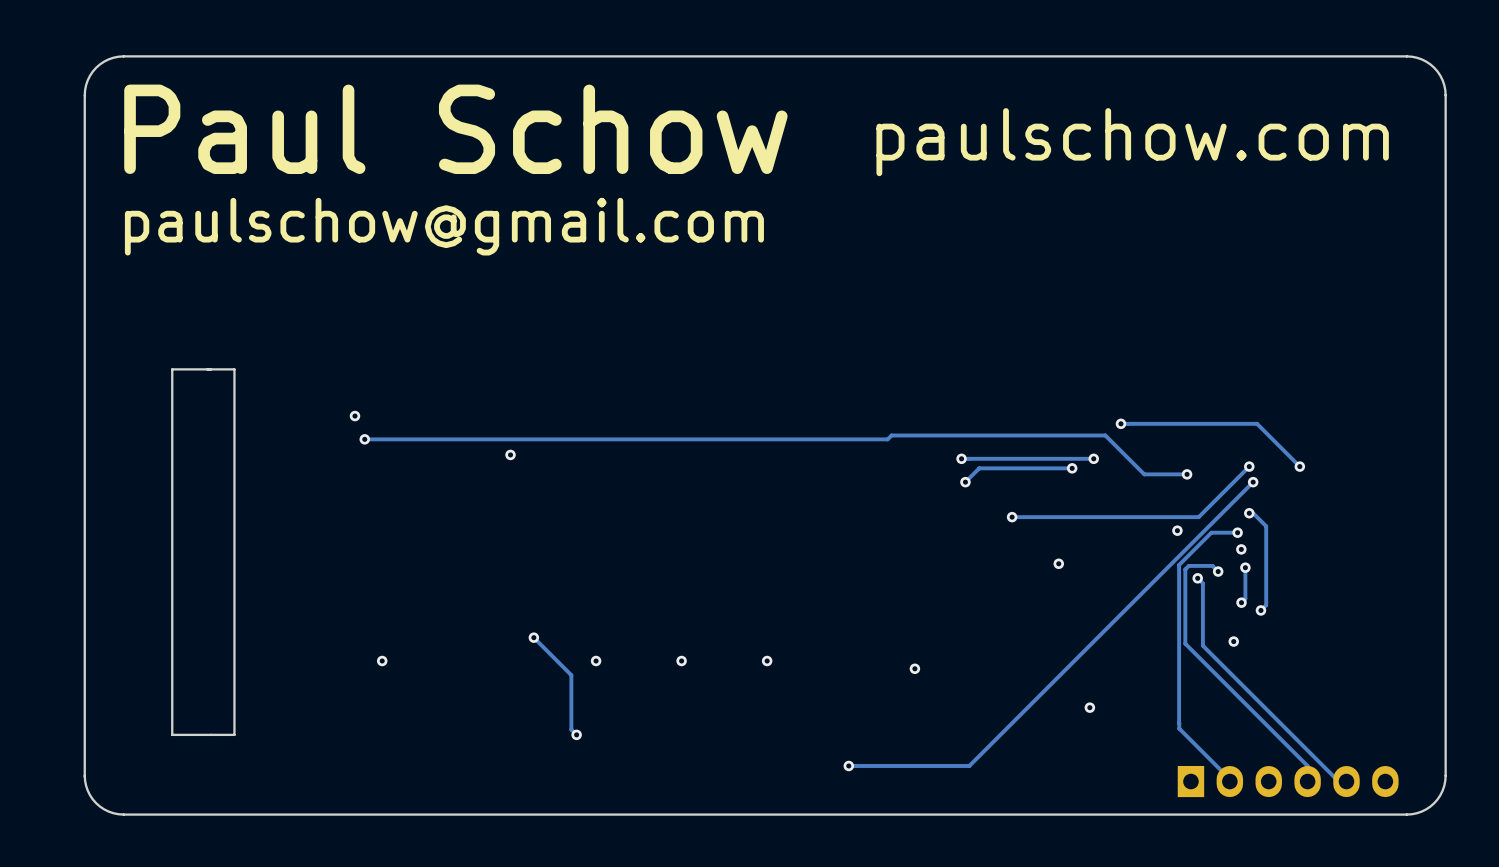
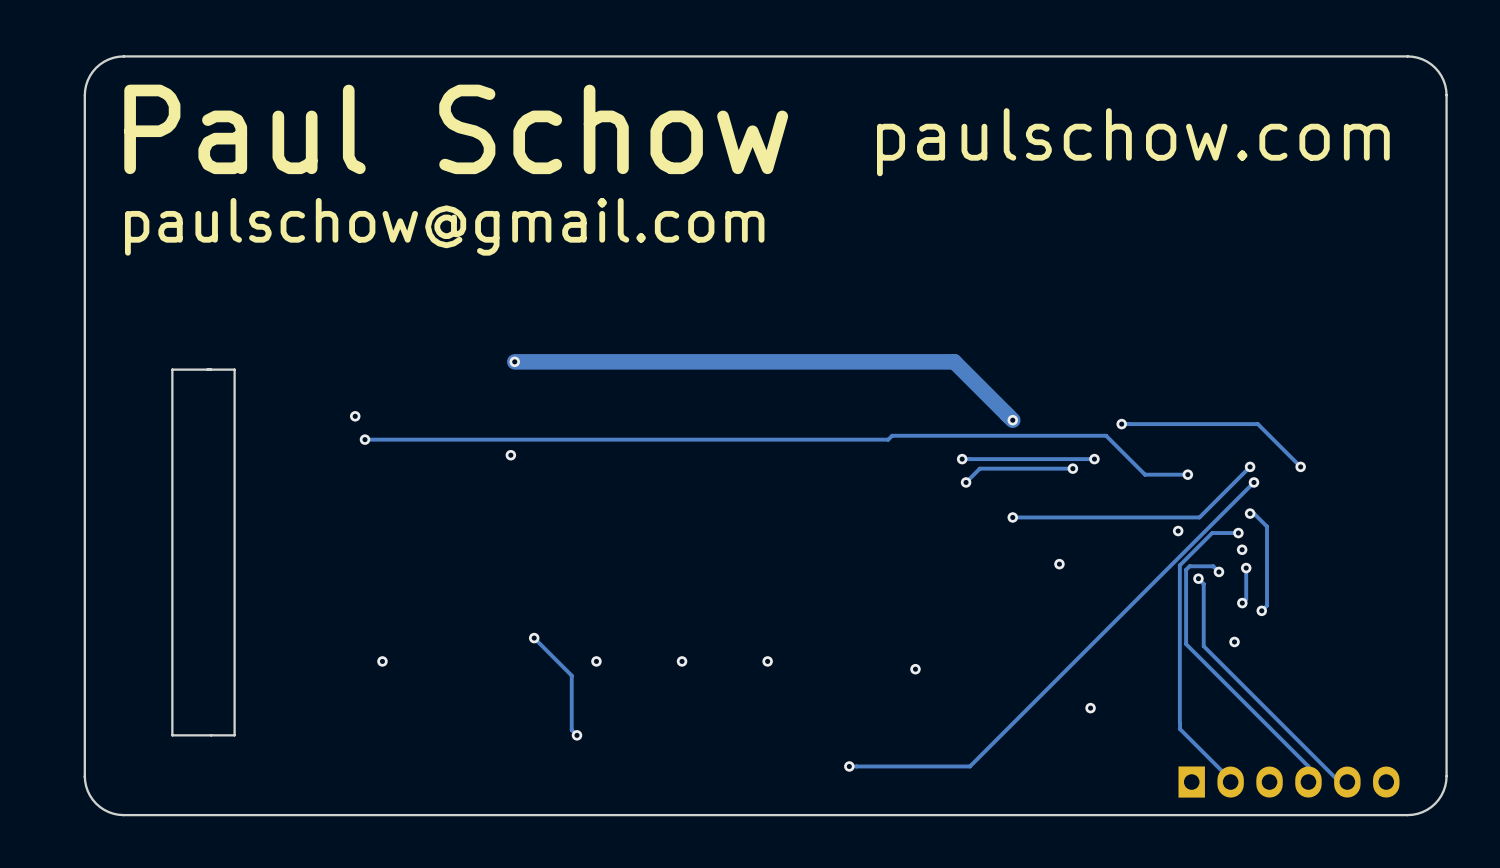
track: none -> (514, 361) (954, 361) (1012, 420)
via: none -> (514, 361)
via: none -> (1012, 420)

